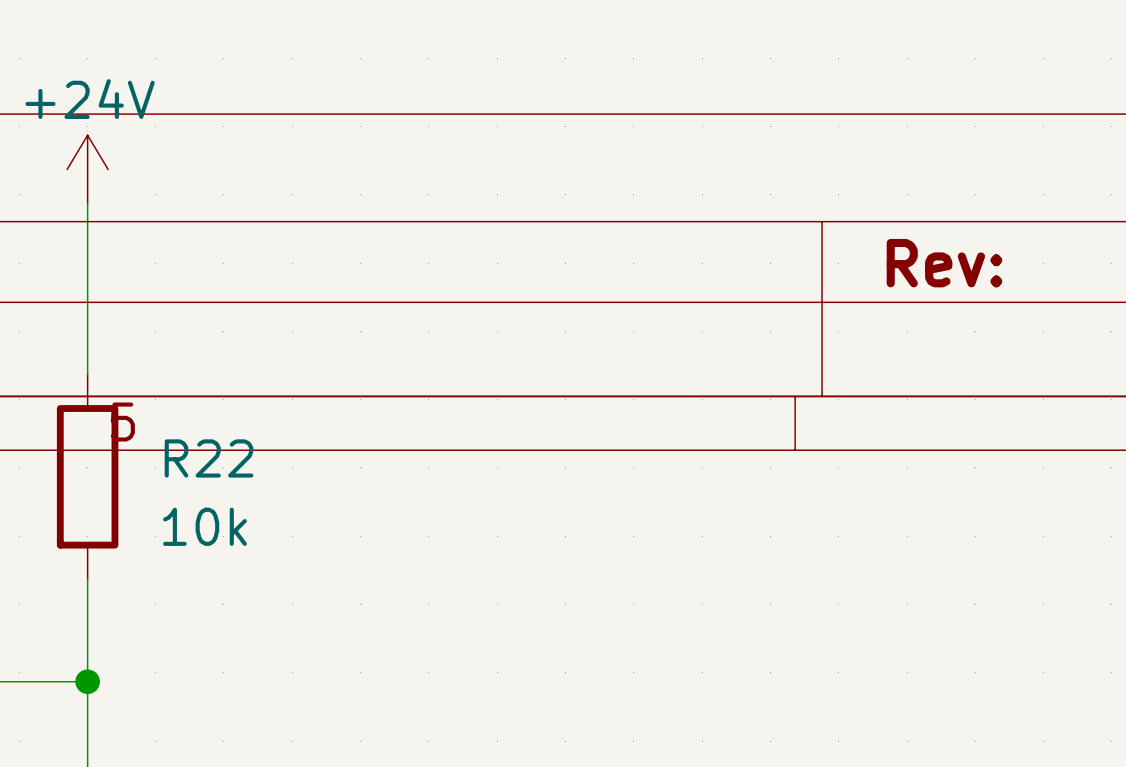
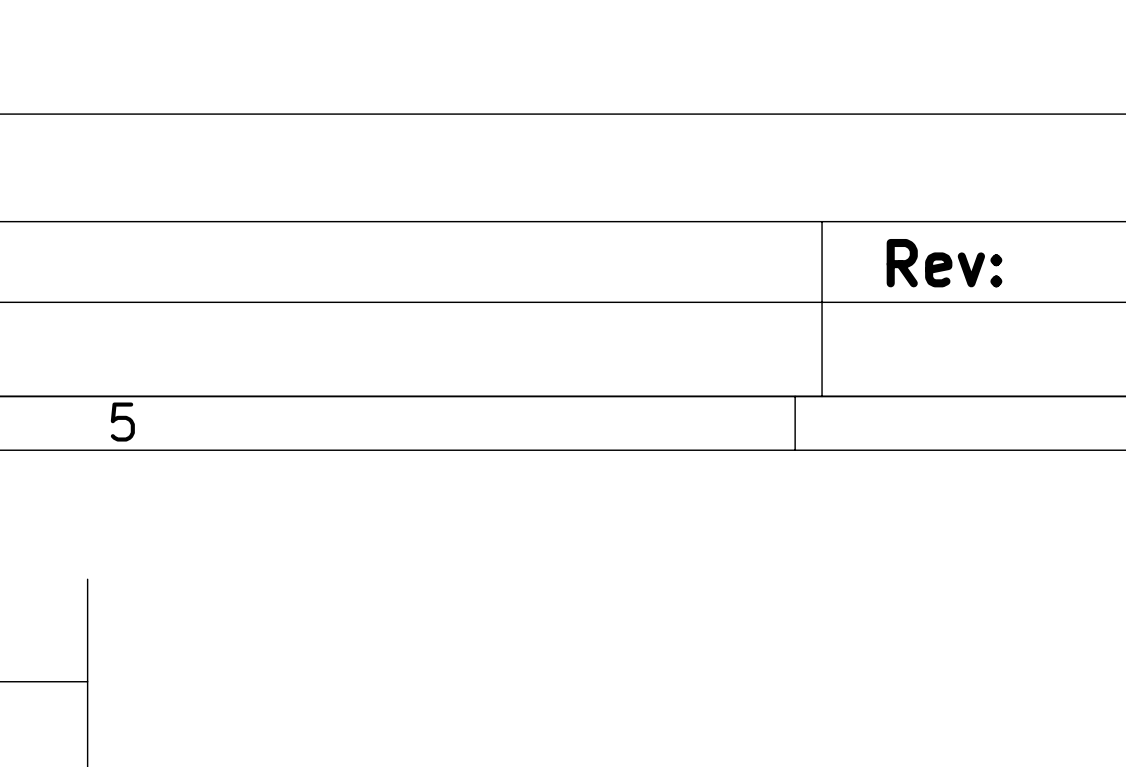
power symbol: +24V (87, 169) -> none
wire: (87, 203) (87, 374) -> none
R22: 10k (87, 476) -> none
junction: (87, 681) -> none

